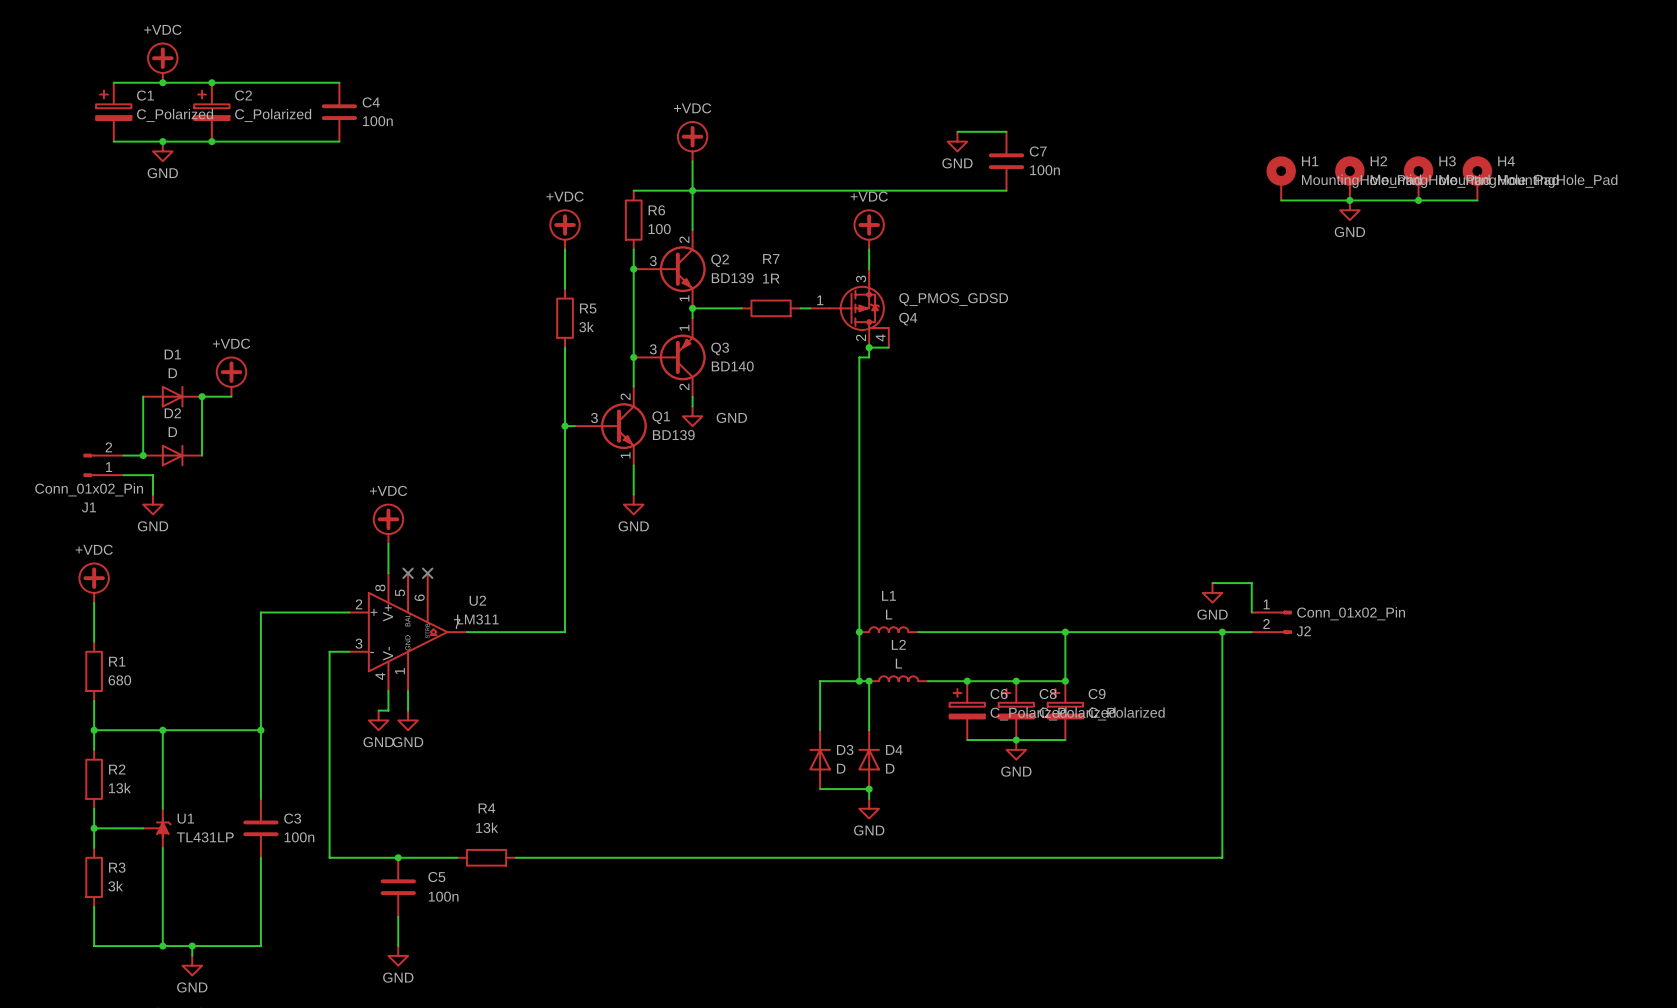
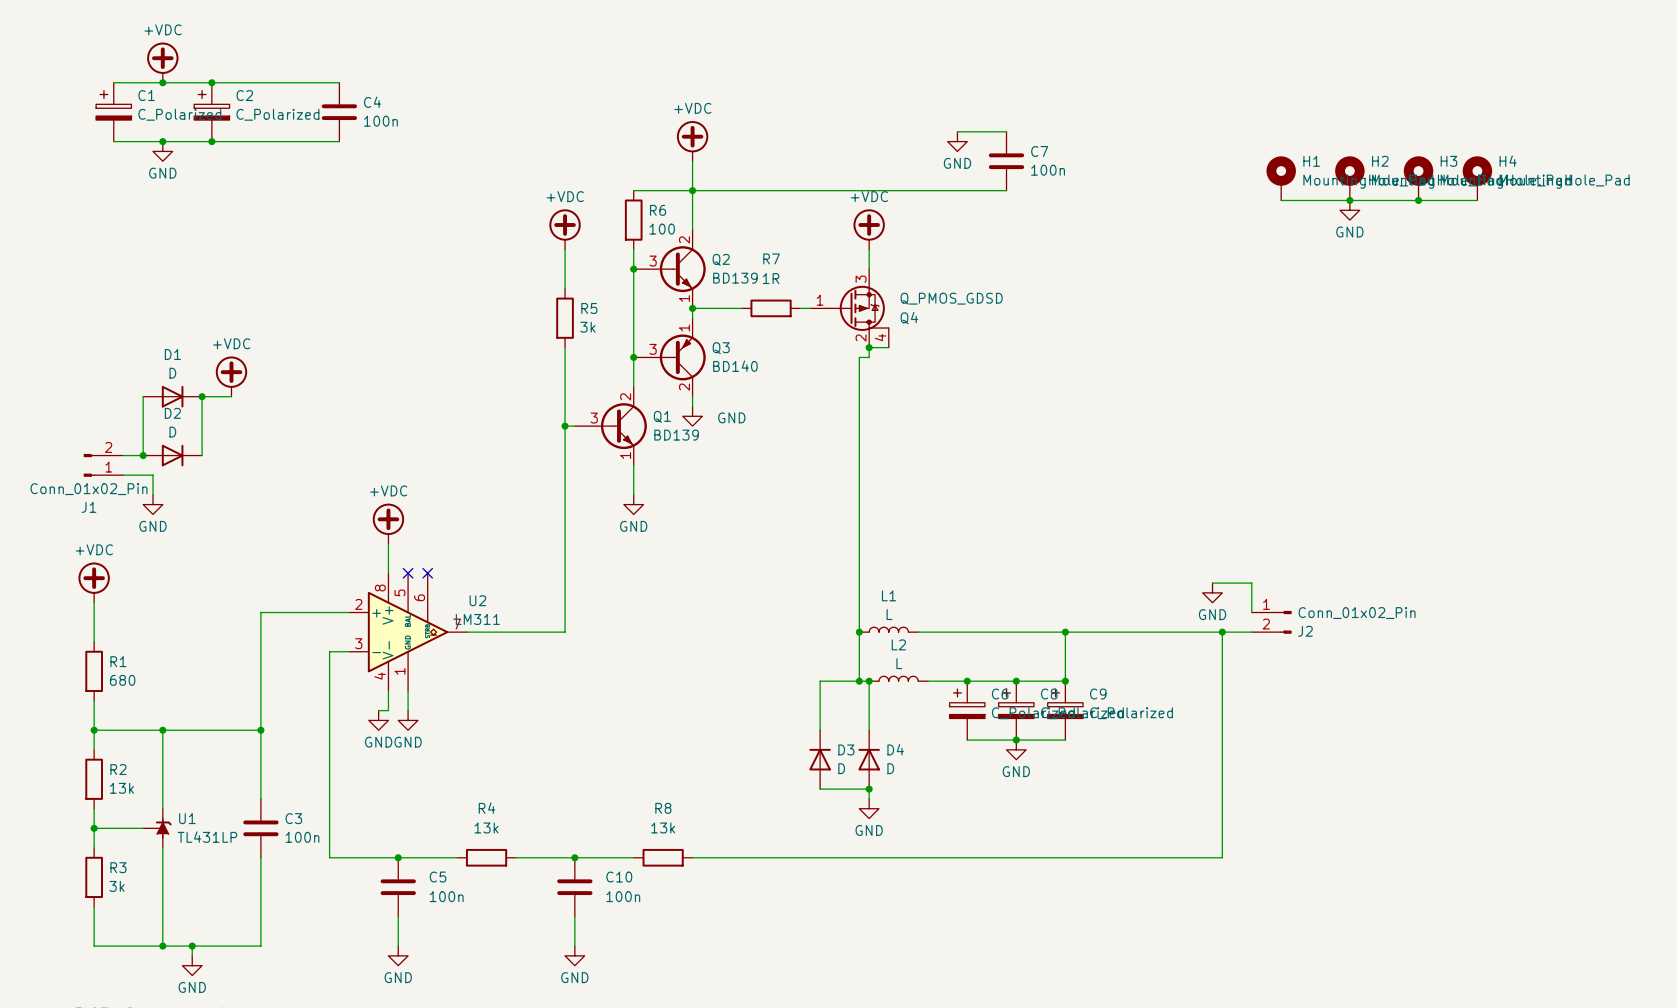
junction: none -> (574, 857)
wire: (633, 857) (692, 857) -> none
R8: none -> 13k (663, 857)
C10: none -> 100n (574, 887)
wire: none -> (574, 916) (574, 946)
power symbol: none -> GND (574, 955)

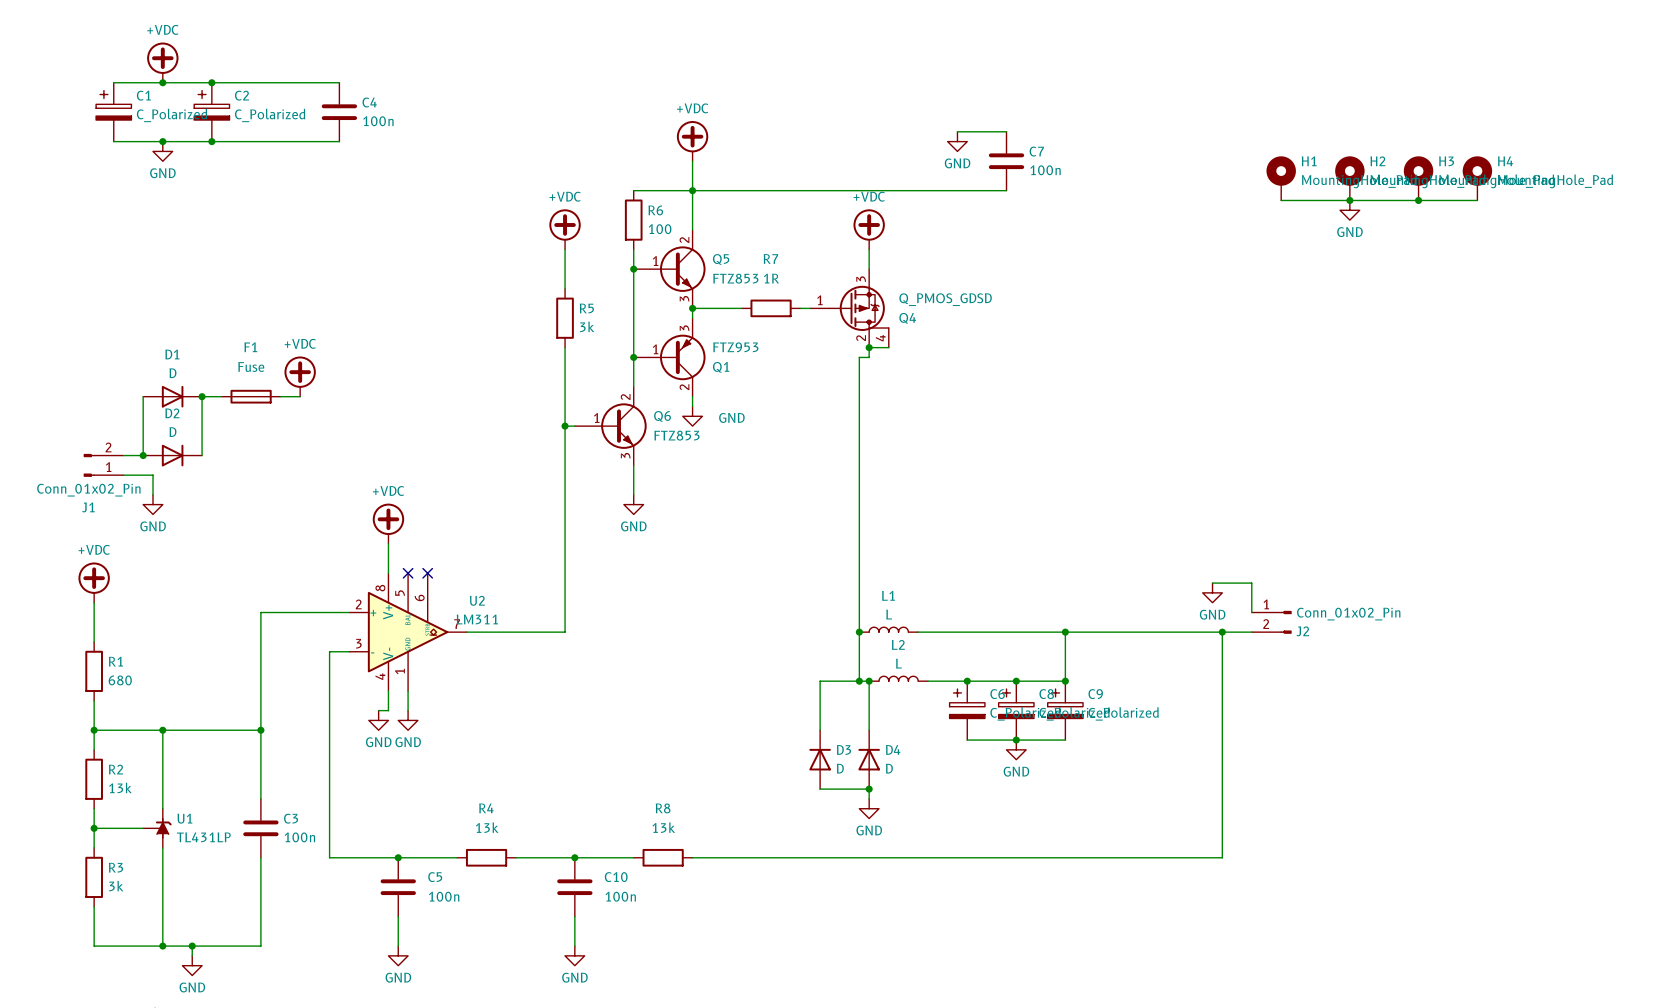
Q2: BD139 (669, 269) -> none
Q5: none -> FTZ853 (669, 269)
Q3: BD140 (669, 357) -> none
power symbol position: +VDC (231, 376) -> +VDC (300, 376)
Q1 symbol: [574, 386, 647, 466] -> [633, 318, 706, 397]
F1: none -> Fuse (251, 396)
wire: none -> (280, 396) (300, 396)
Q1 name position: Q1 (662, 416) -> Q1 (721, 367)
Q6: none -> FTZ853 (610, 426)
Q1 value: BD139 (676, 435) -> FTZ953 (735, 347)

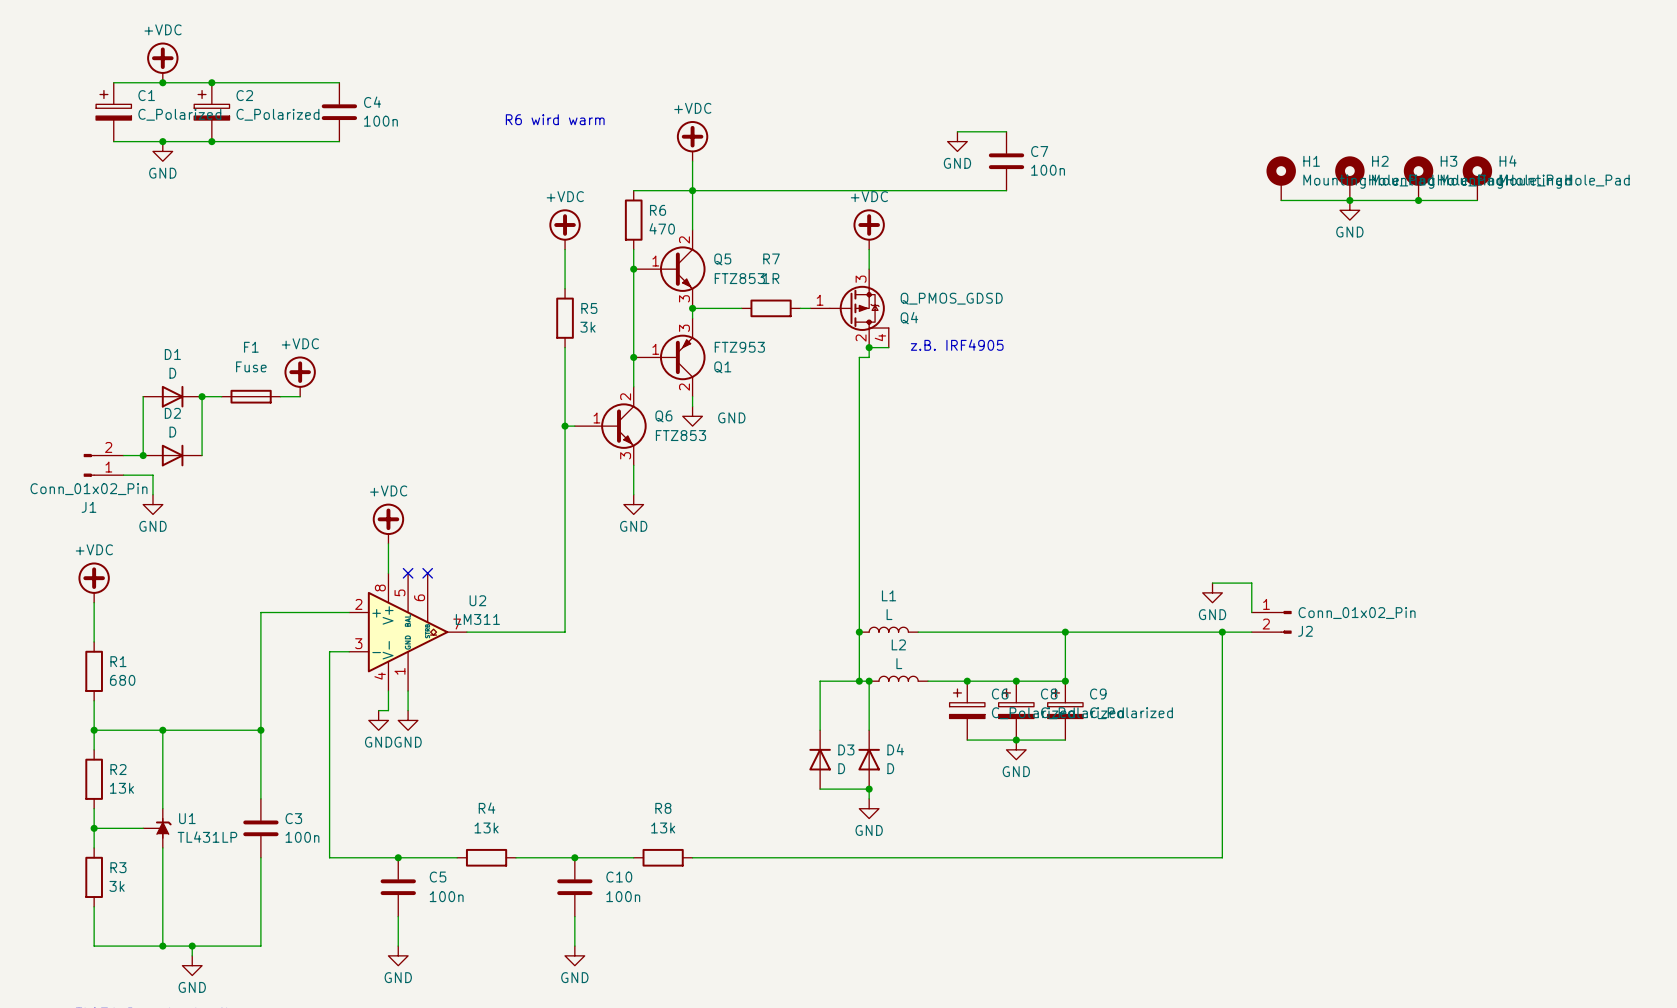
text: none -> R6 wird warm (555, 119)
R6 value: 100 (660, 229) -> 470 (662, 228)
text: none -> z.B. IRF4905 (957, 345)

